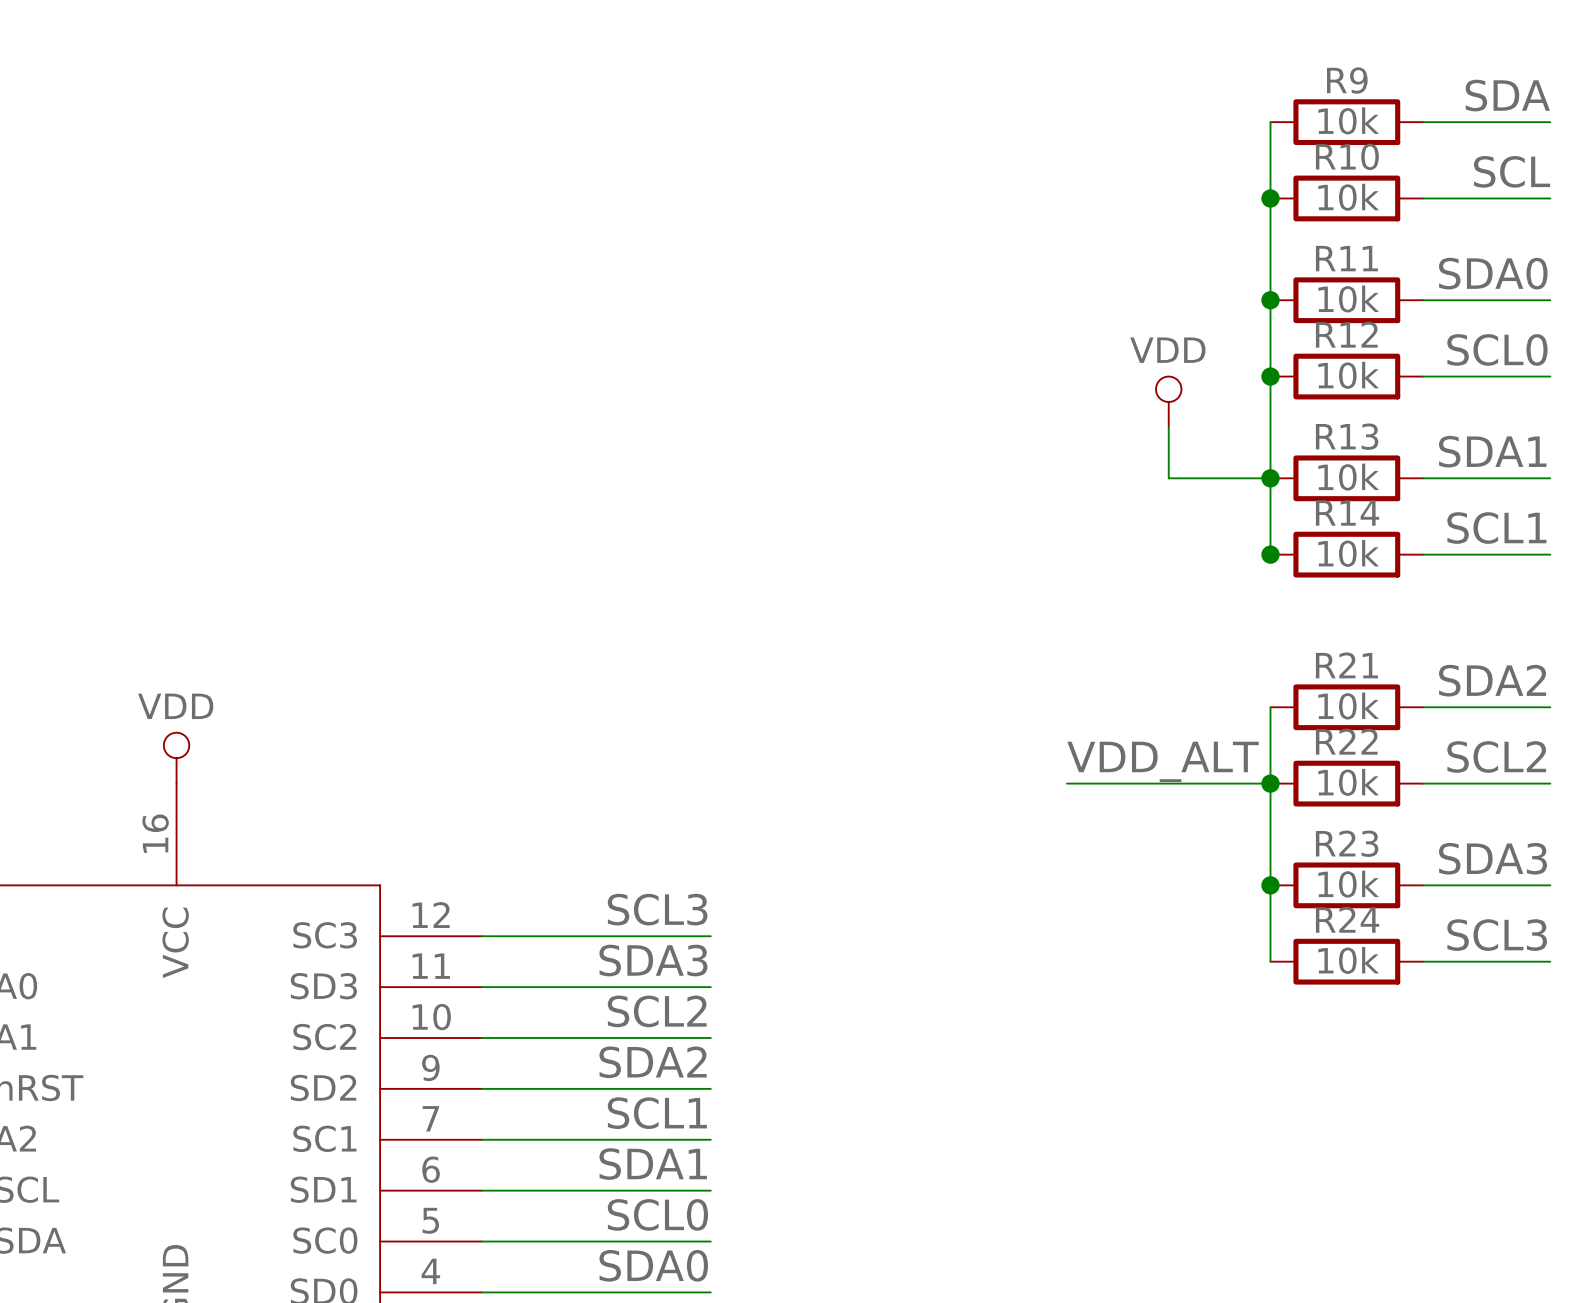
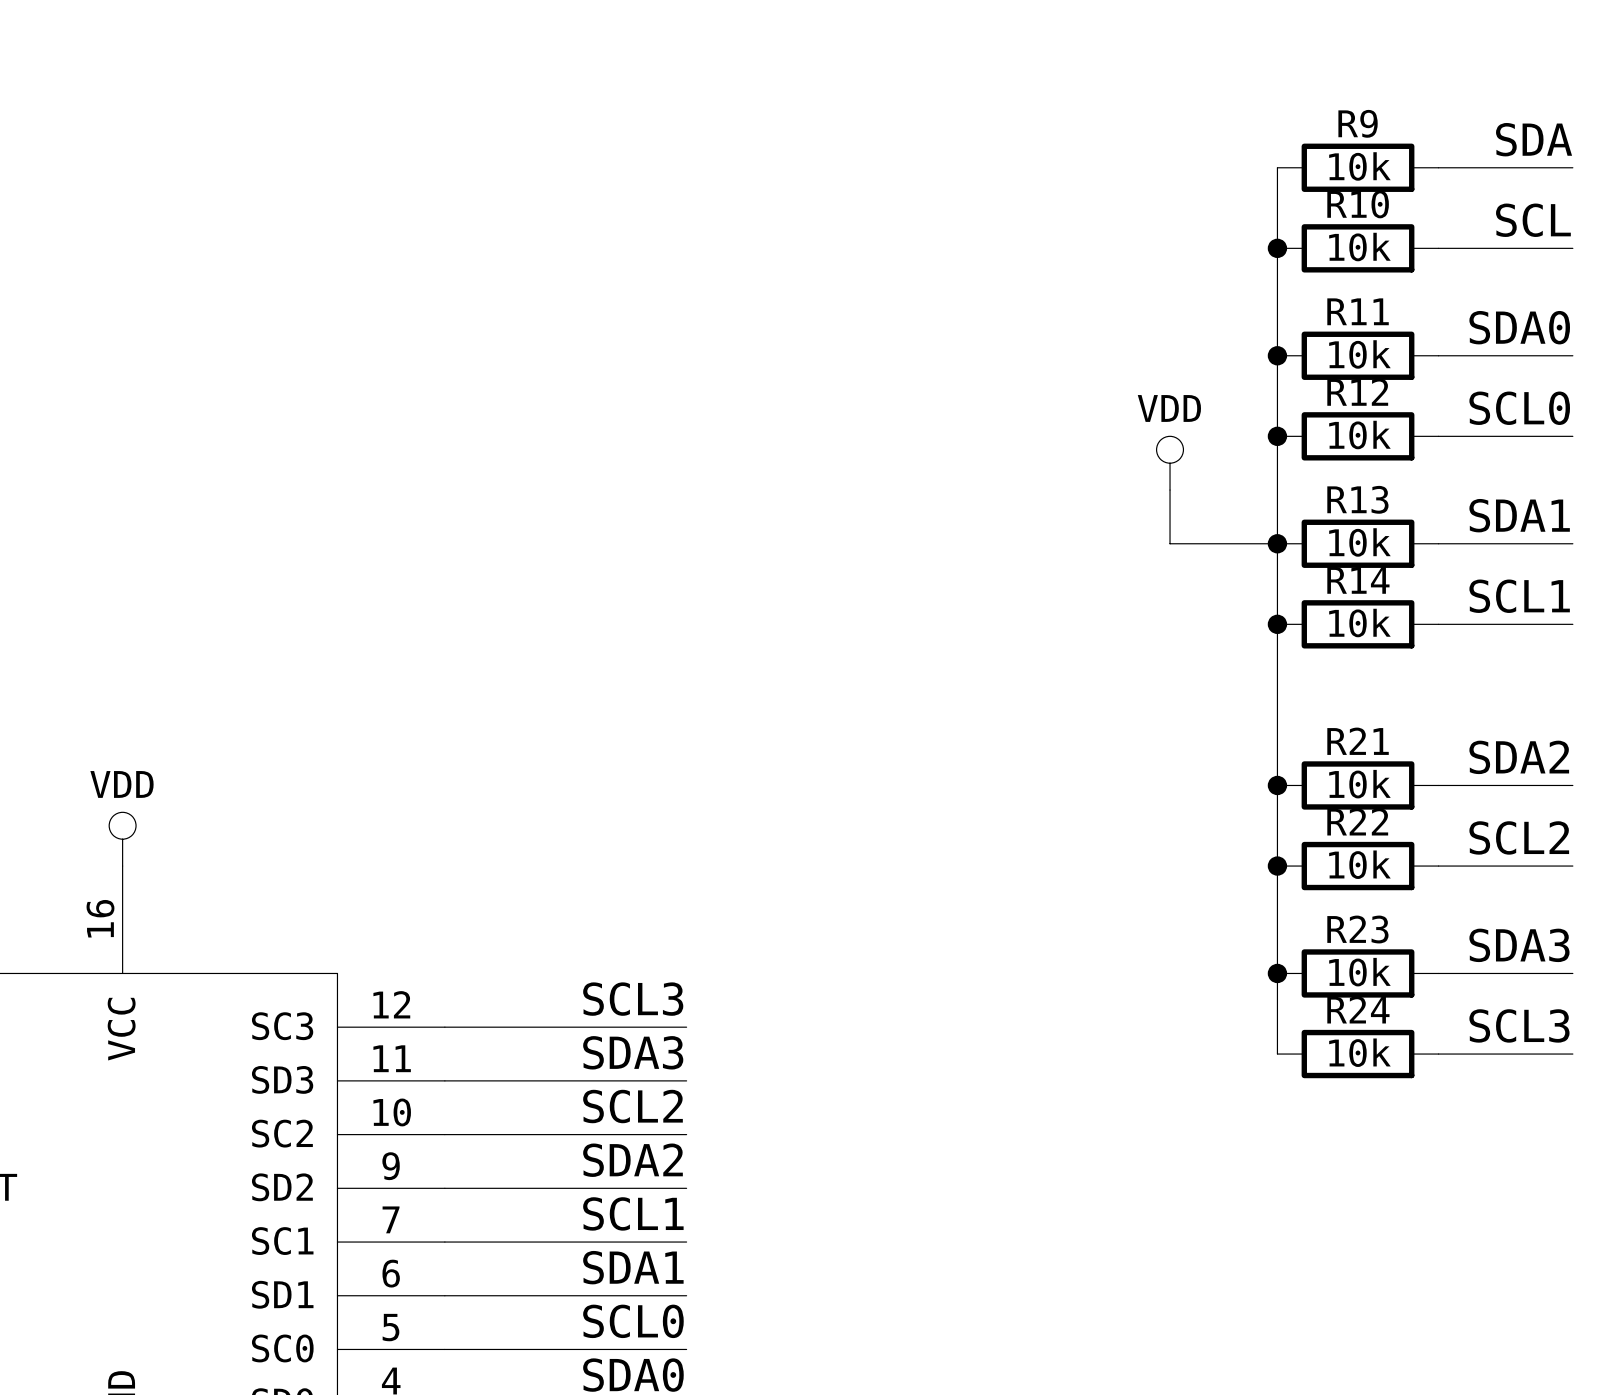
wire: none -> (1277, 624) (1277, 785)
junction: none -> (1277, 785)
label: VDD_ALT (1163, 761) -> none
wire: (1066, 783) (1270, 783) -> none

